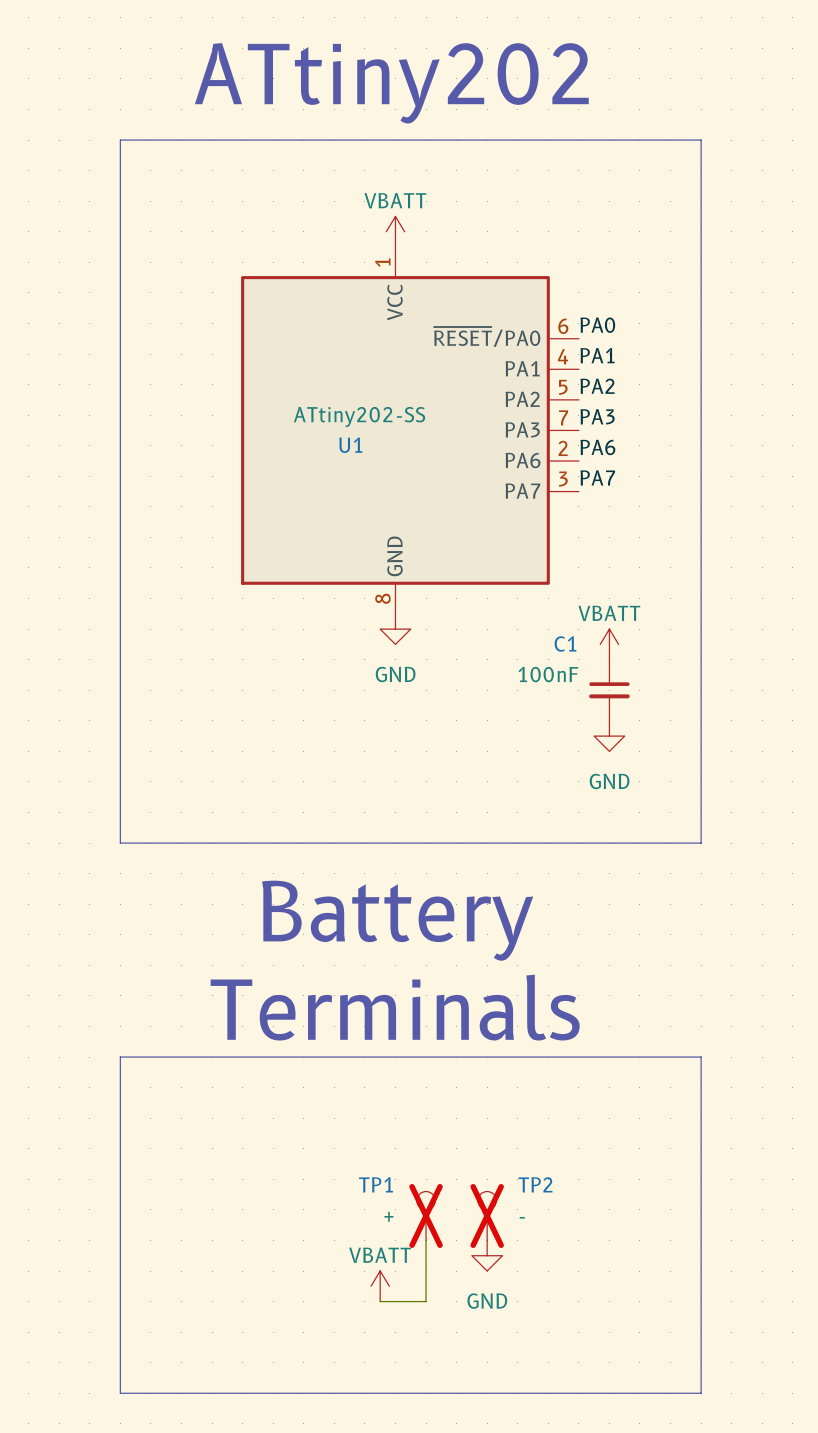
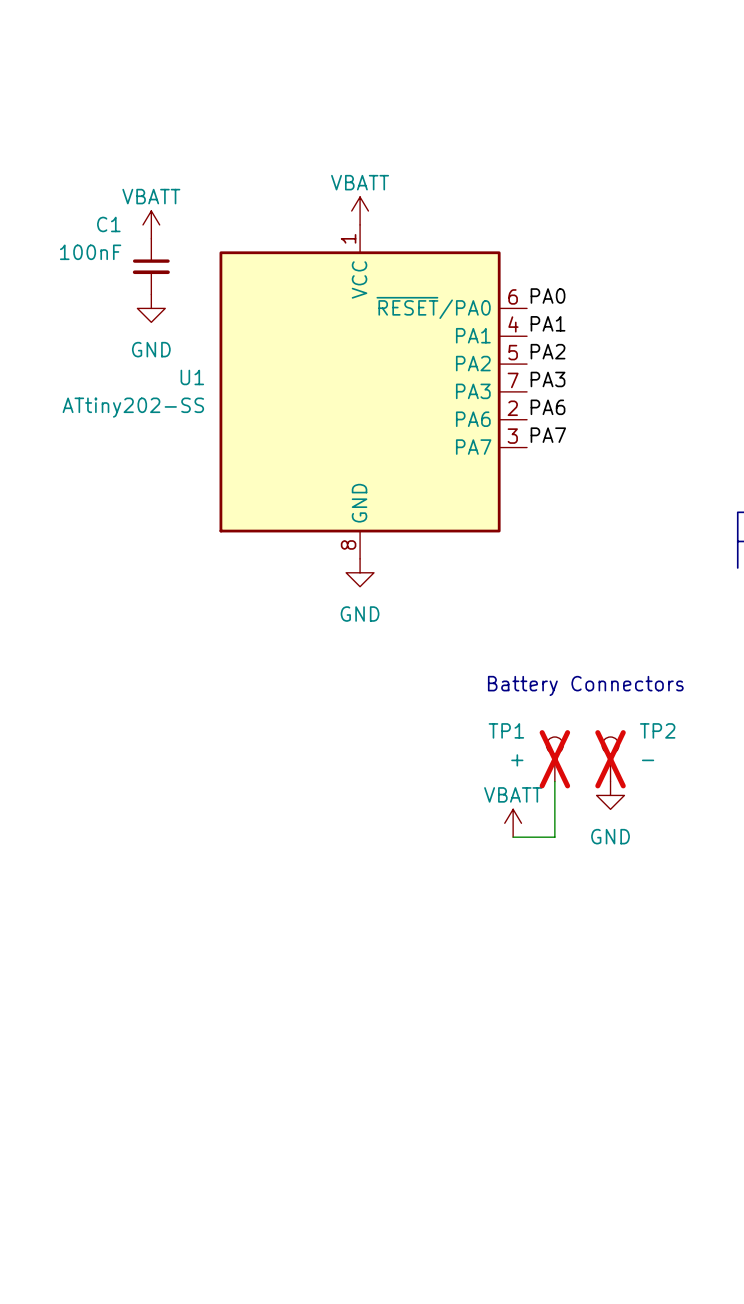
text: ATtiny202 (391, 83) -> none
line: (120, 140) (701, 140) (701, 843) (120, 843) (120, 140) -> none
power symbol: none -> VBATT (151, 224)
power symbol: none -> GND (151, 308)
U1 value position: ATtiny202-SS (359, 416) -> ATtiny202-SS (133, 407)
U1 name position: U1 (350, 445) -> U1 (192, 377)
power symbol: VBATT (609, 644) -> none
C1 position: (609, 690) -> (151, 266)
power symbol position: GND (609, 736) -> GND (610, 795)
text: none -> Battery Connectors (585, 685)
wire: none -> (554, 781) (554, 837) (513, 837)
power symbol: none -> VBATT (513, 823)
text: Battery (397, 920) -> none
text: Terminals (395, 1007) -> none
line: (120, 1057) (120, 1393) (701, 1393) (701, 1057) (120, 1057) -> none
TP1 position: (426, 1215) -> (554, 759)
TP2 position: (487, 1215) -> (610, 759)
wire: (426, 1240) (426, 1301) (380, 1301) -> none
power symbol: GND (487, 1255) -> none
power symbol: VBATT (380, 1286) -> none

